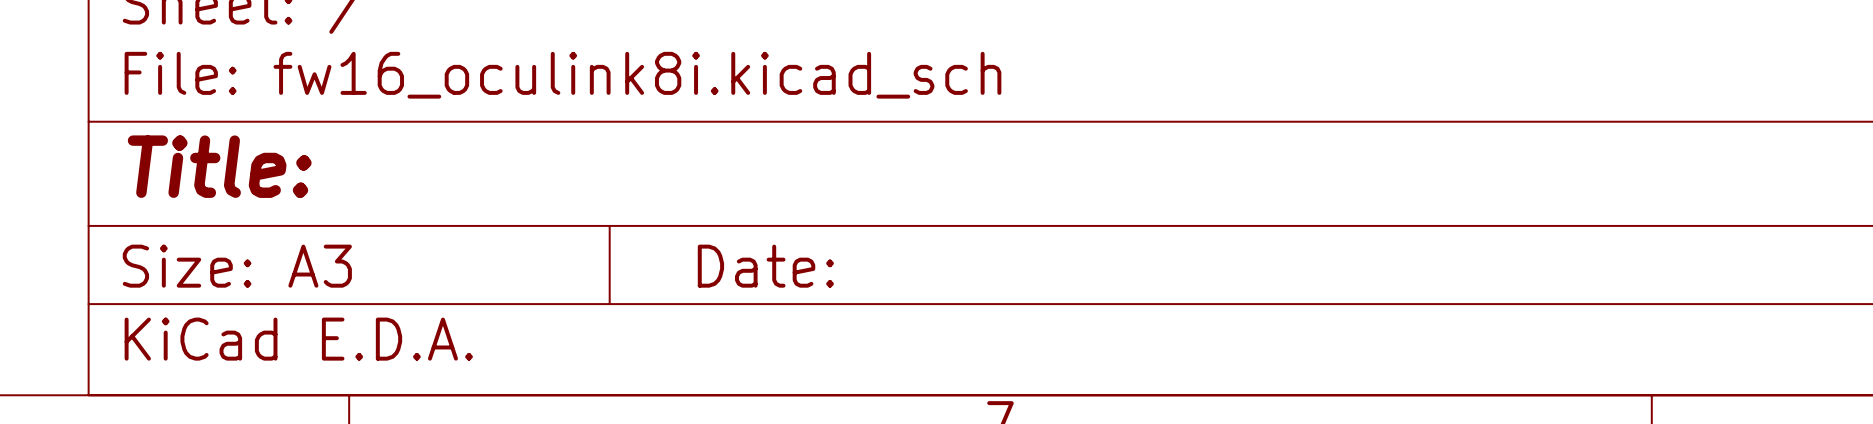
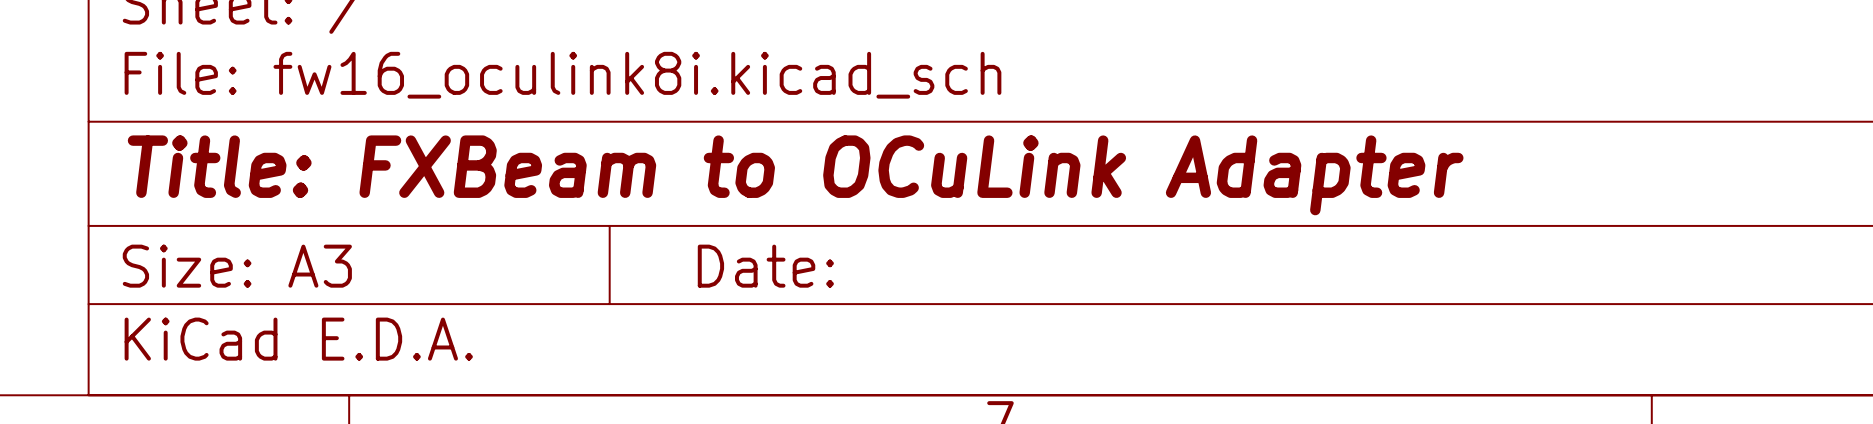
title block: Title: (219, 166) -> Title: FXBeam to OCuLink Adapter (795, 175)

